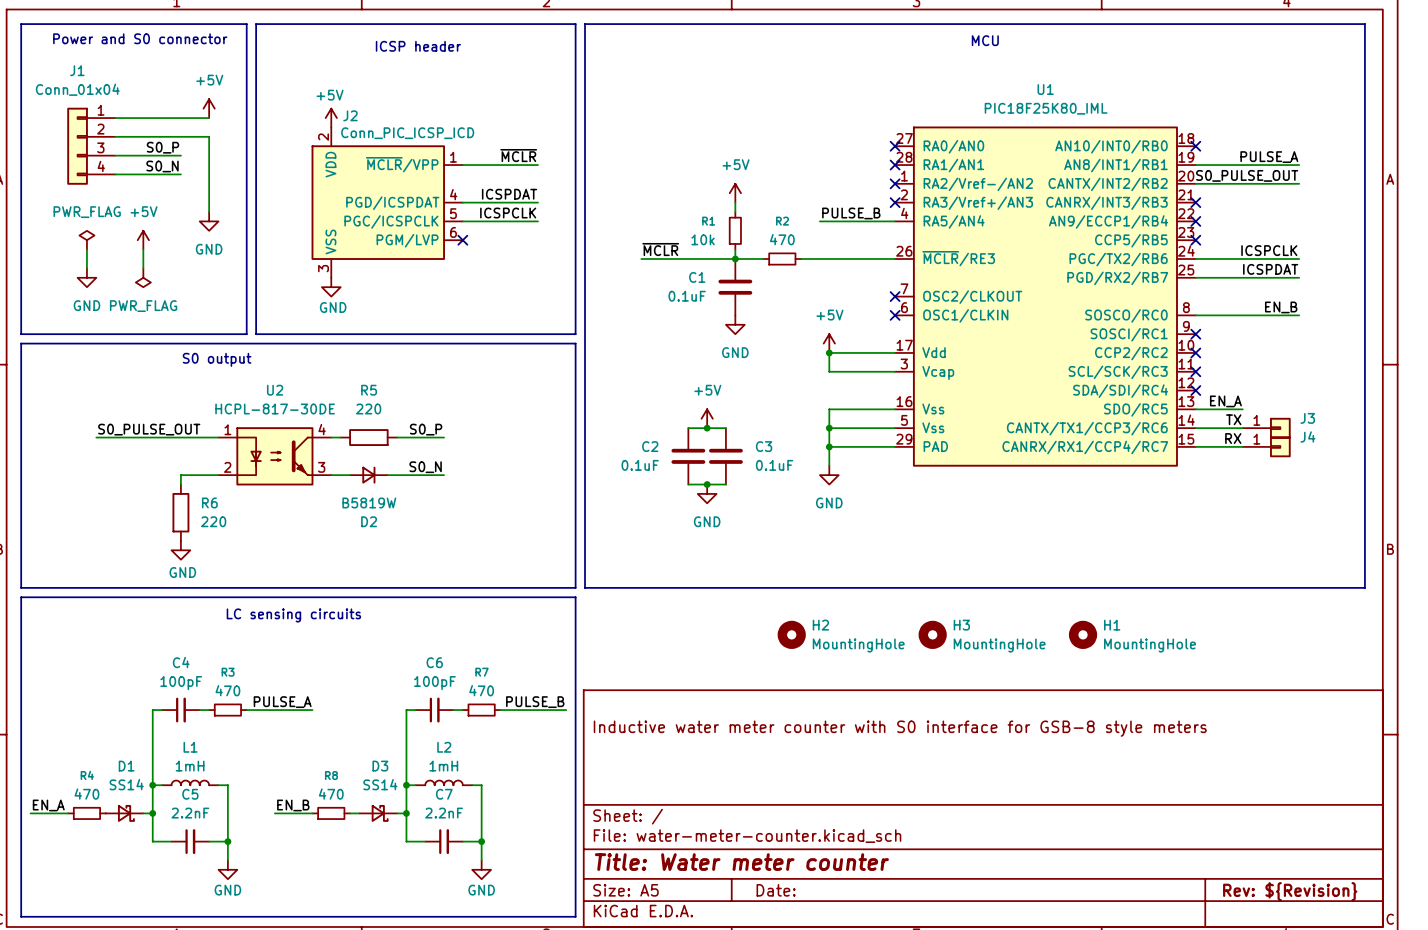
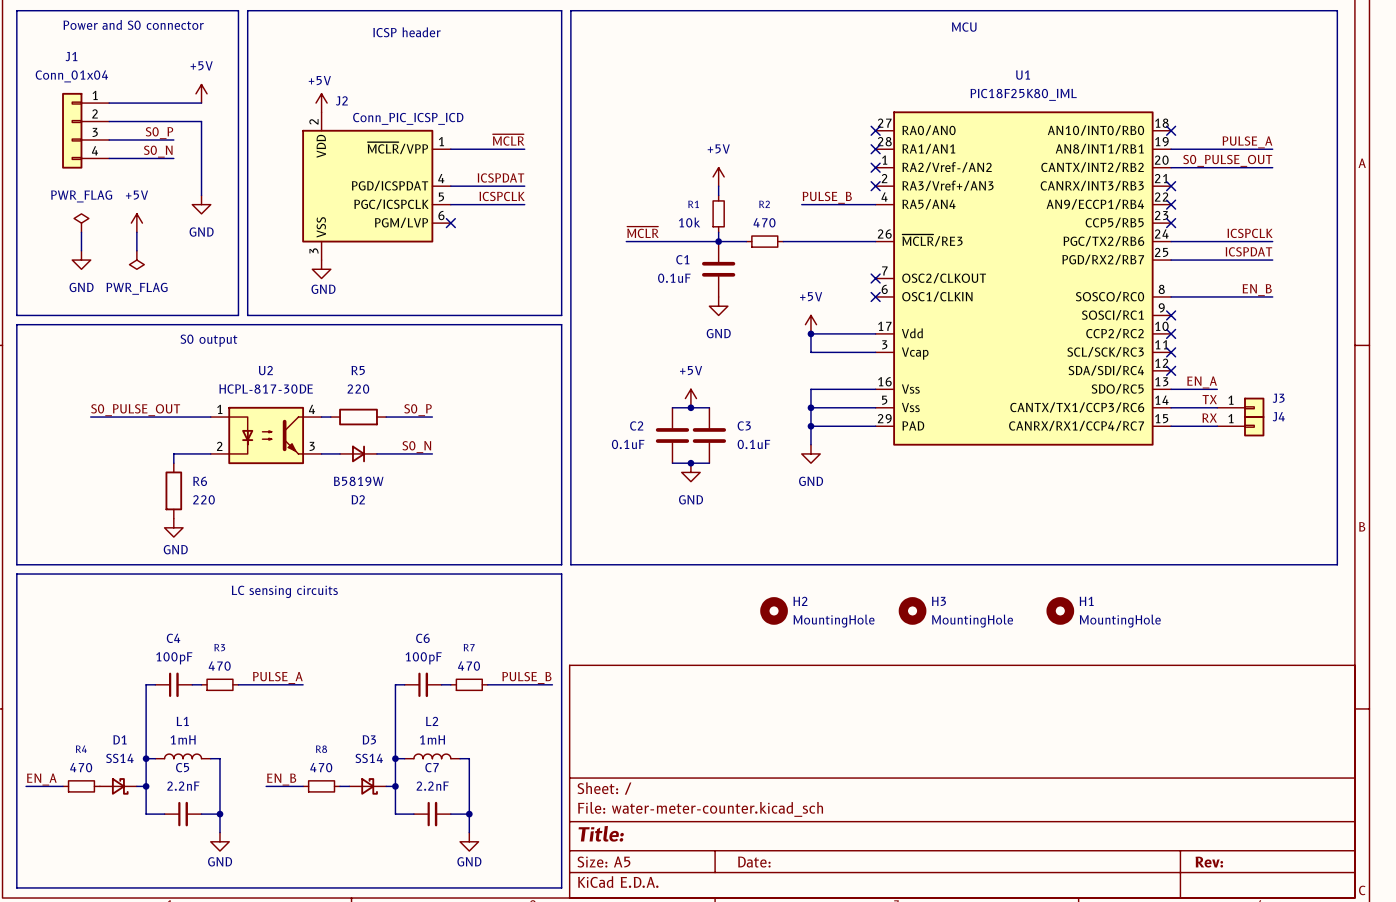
title block: Inductive water meter counter with S0 interface for GSB-8 style meters (900, 728) -> none
title block: Title: Water meter counter (741, 862) -> Title: (601, 833)
title block: Rev: ${Revision} (1290, 891) -> Rev: (1209, 862)

